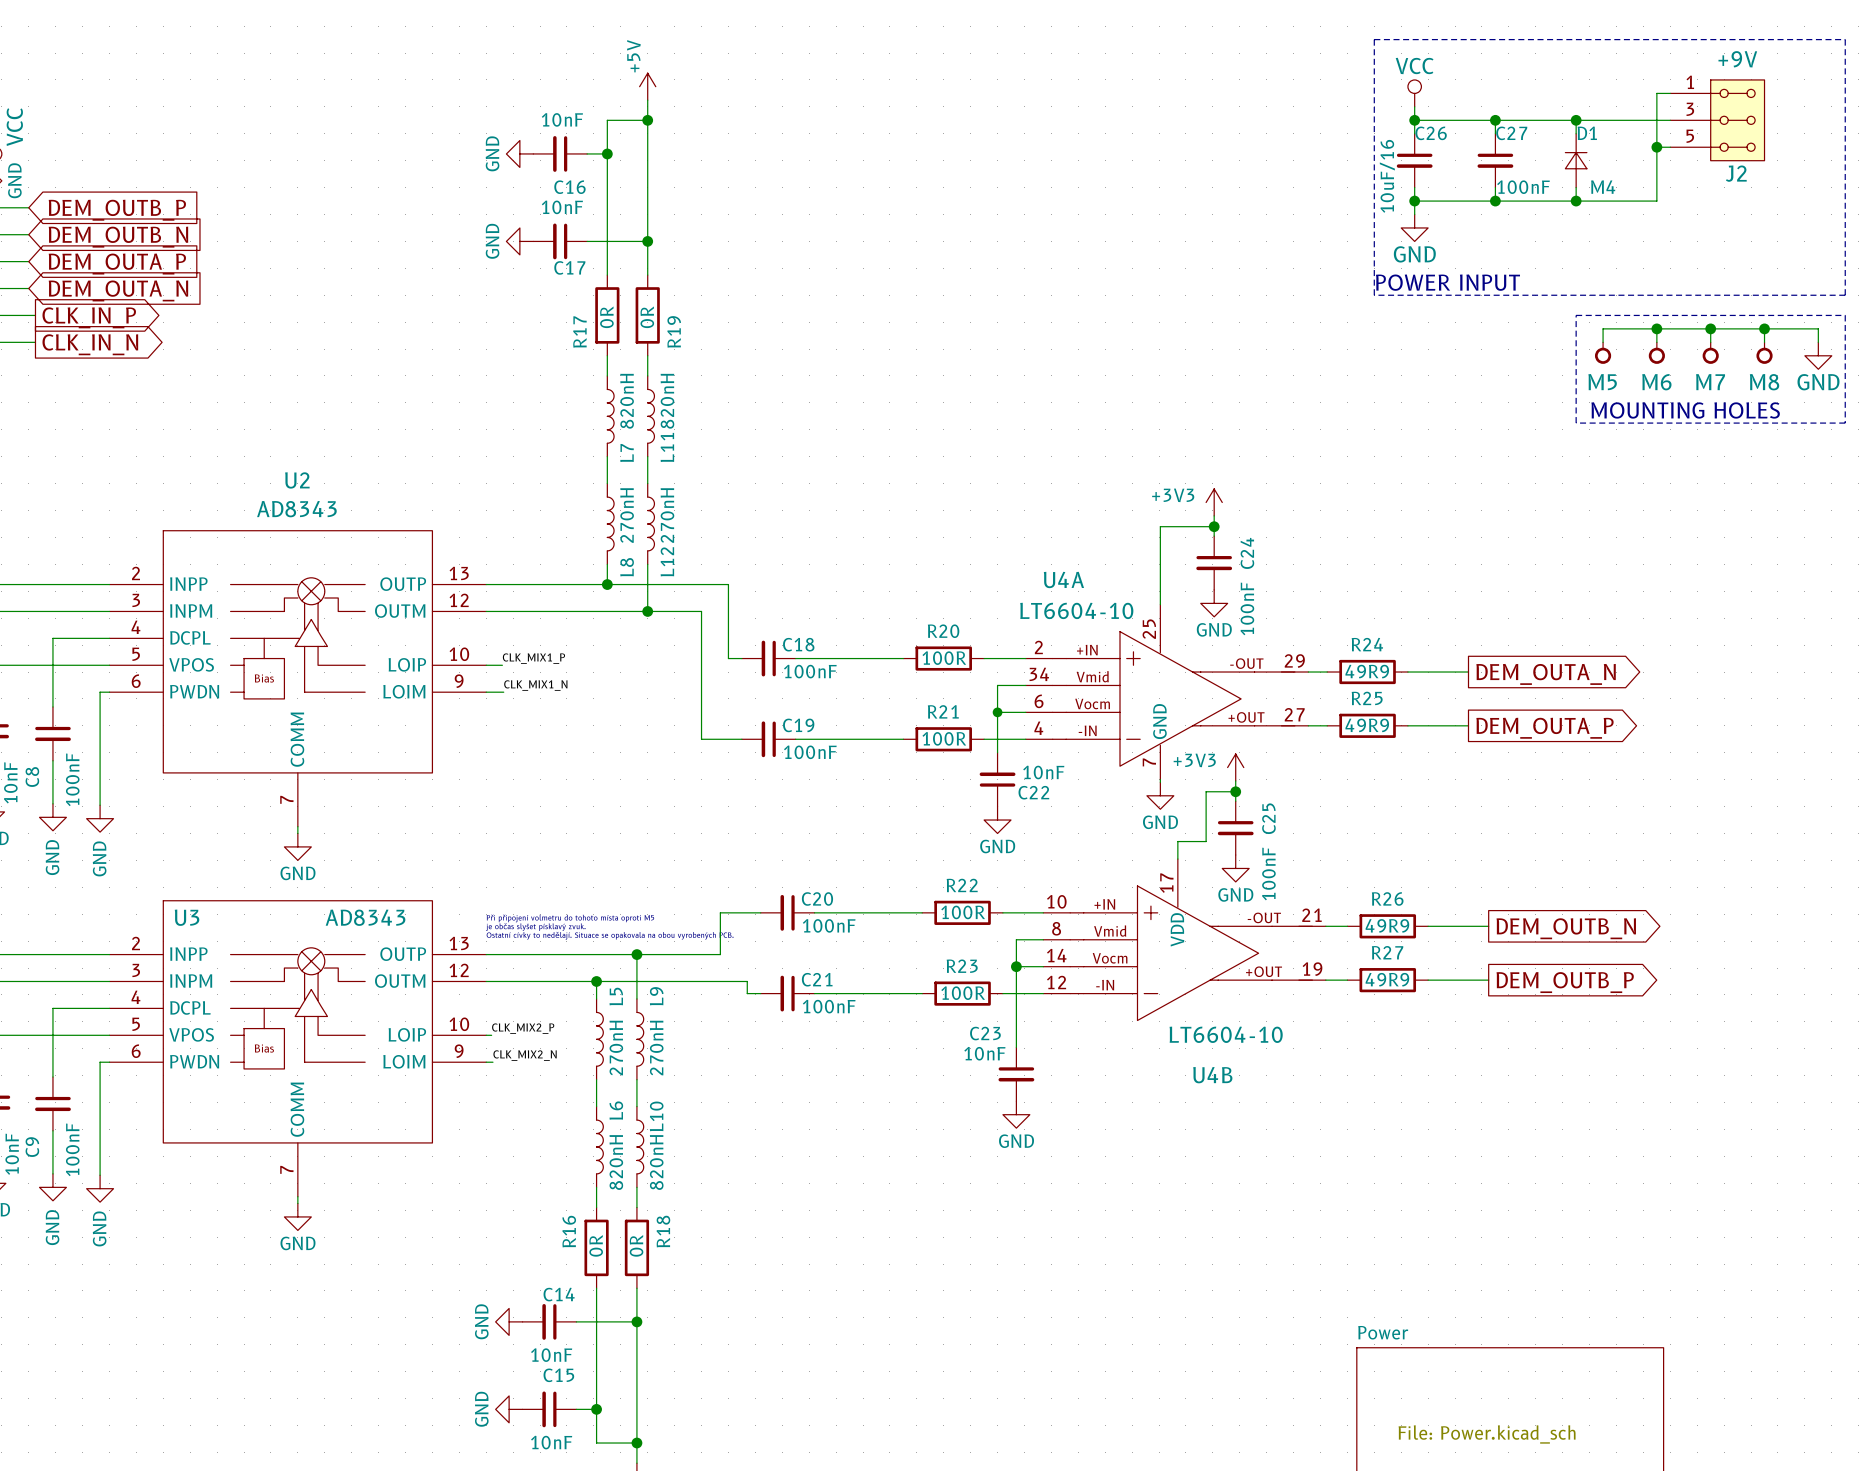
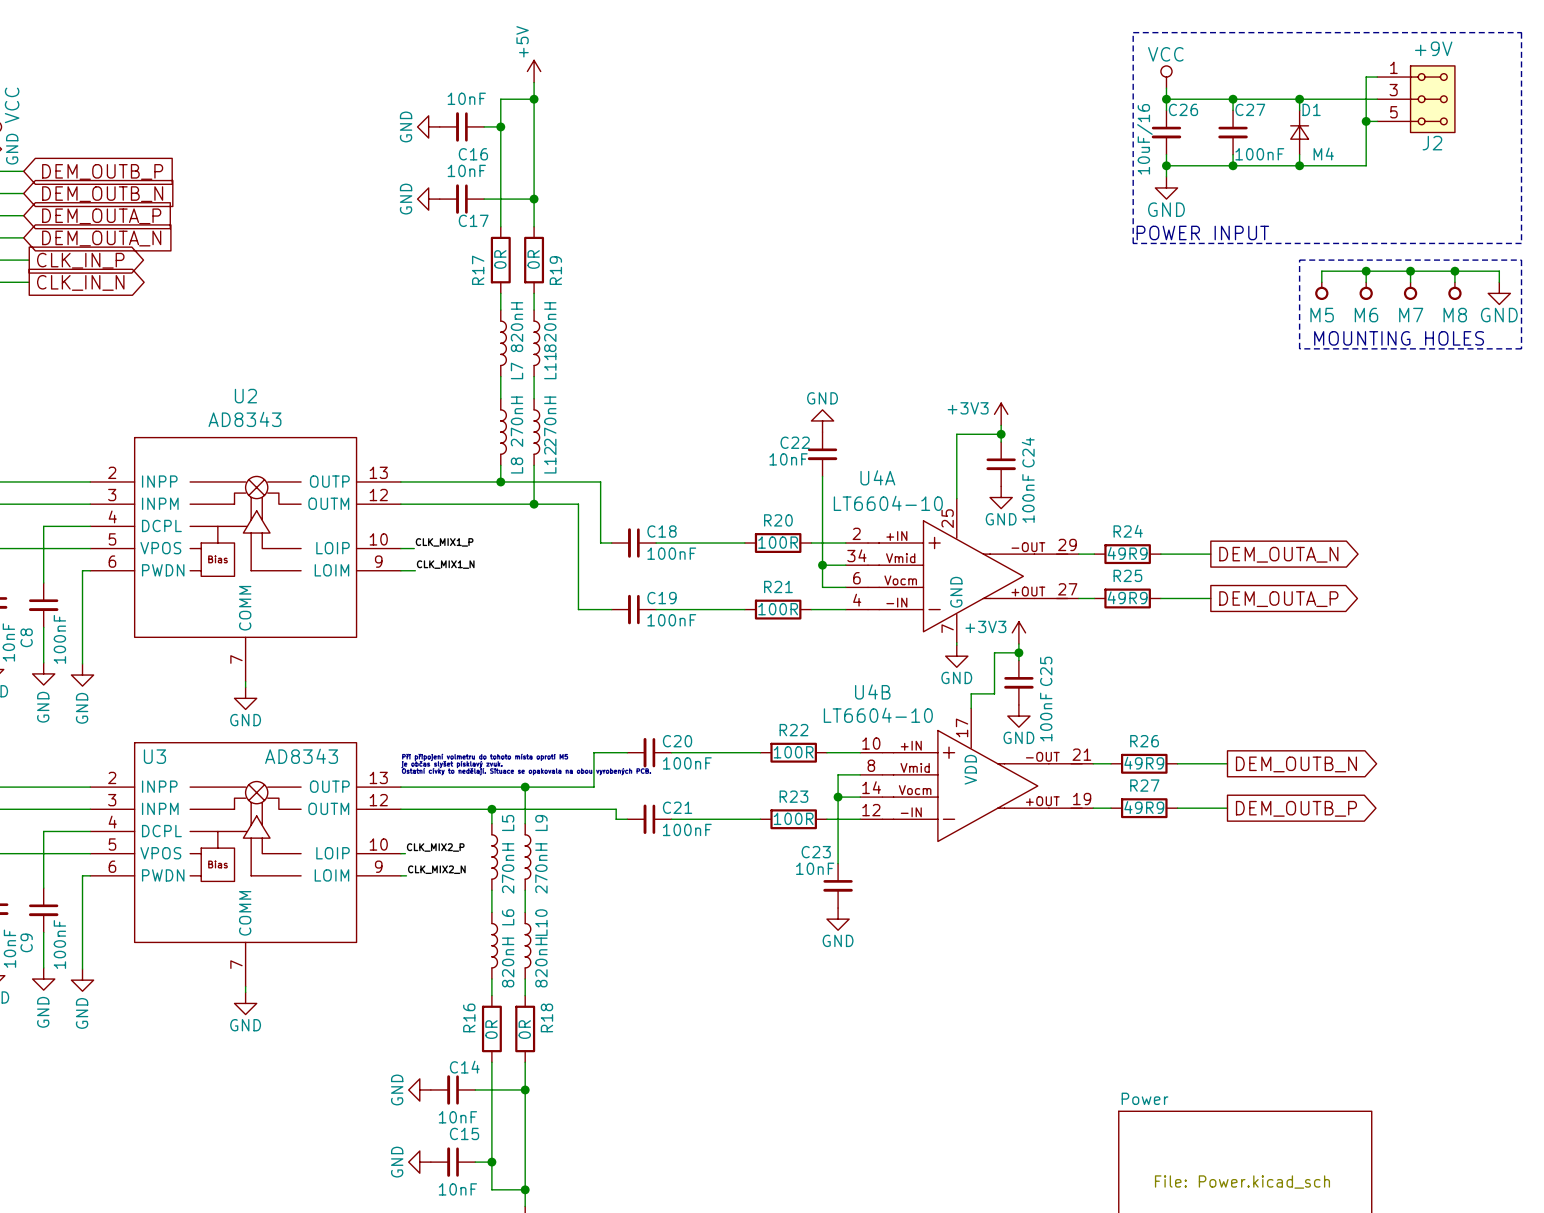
power symbol: none -> GND (822, 420)
wire: none -> (822, 476) (822, 565)
junction: none -> (822, 565)
wire: (997, 712) (997, 752) -> none
junction: (997, 712) -> none
C22 rotation: 0° (997, 779) -> 180° (822, 454)
C22 position: (997, 779) -> (822, 454)
power symbol: GND (997, 820) -> none
U4B value position: LT6604-10 (1226, 1034) -> LT6604-10 (878, 715)
U4B name position: U4B (1212, 1075) -> U4B (872, 691)

